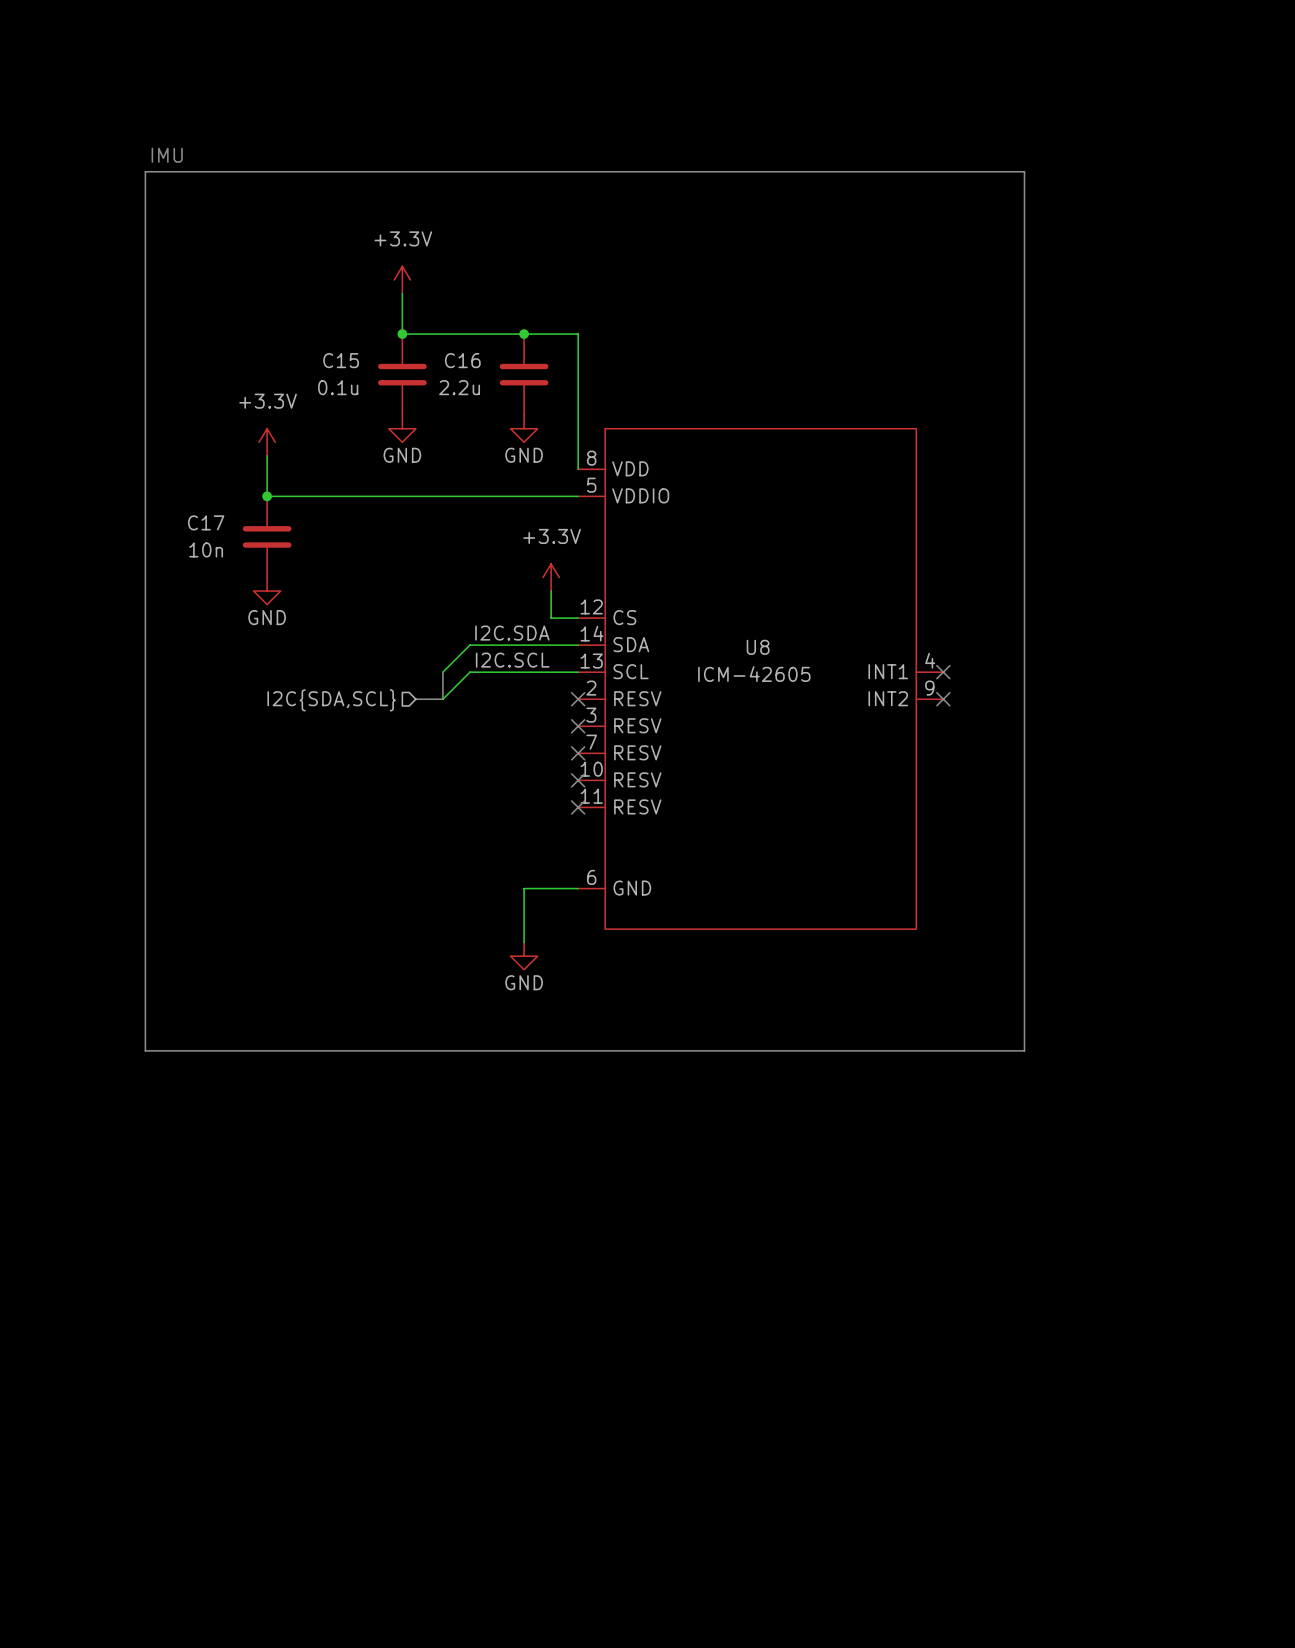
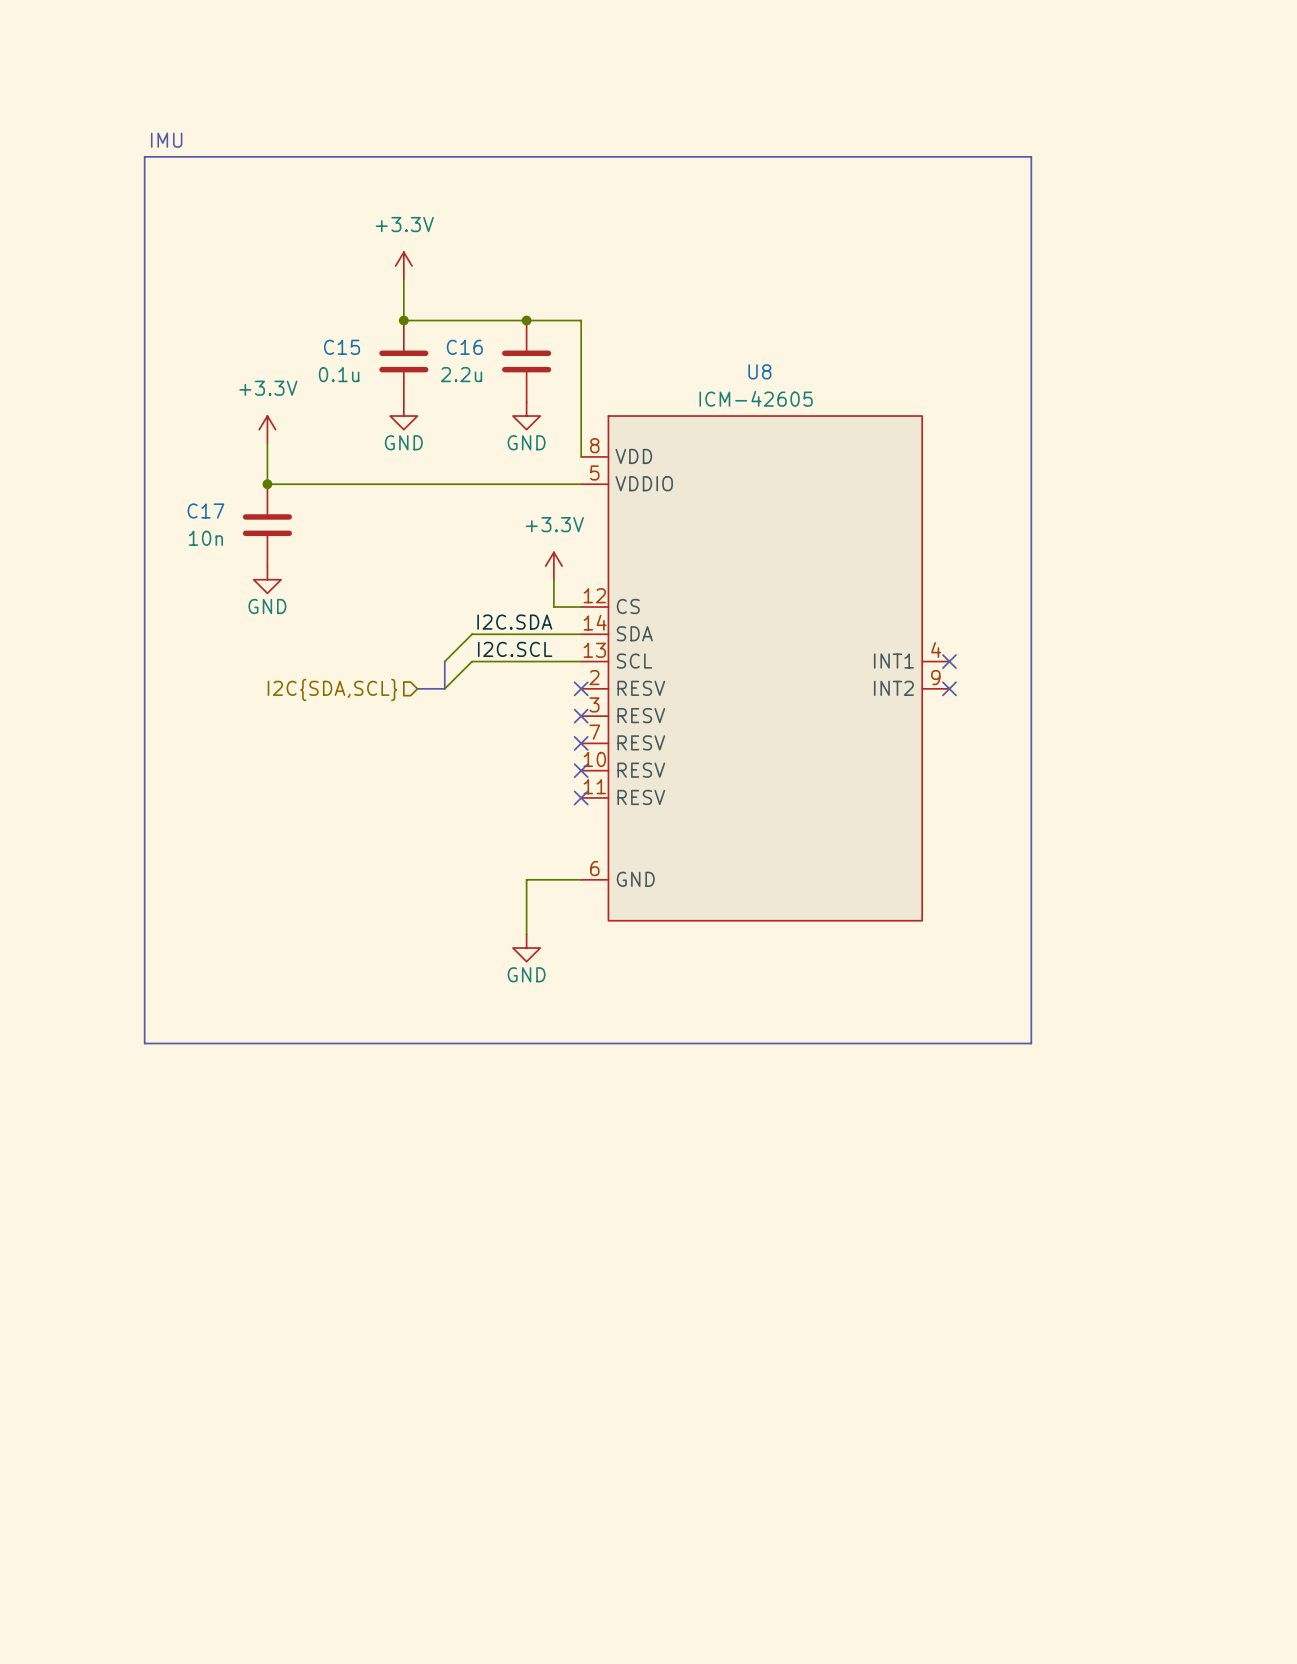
U8 name position: U8 (758, 647) -> U8 (759, 371)
U8 value position: ICM-42605 (754, 674) -> ICM-42605 (756, 398)

